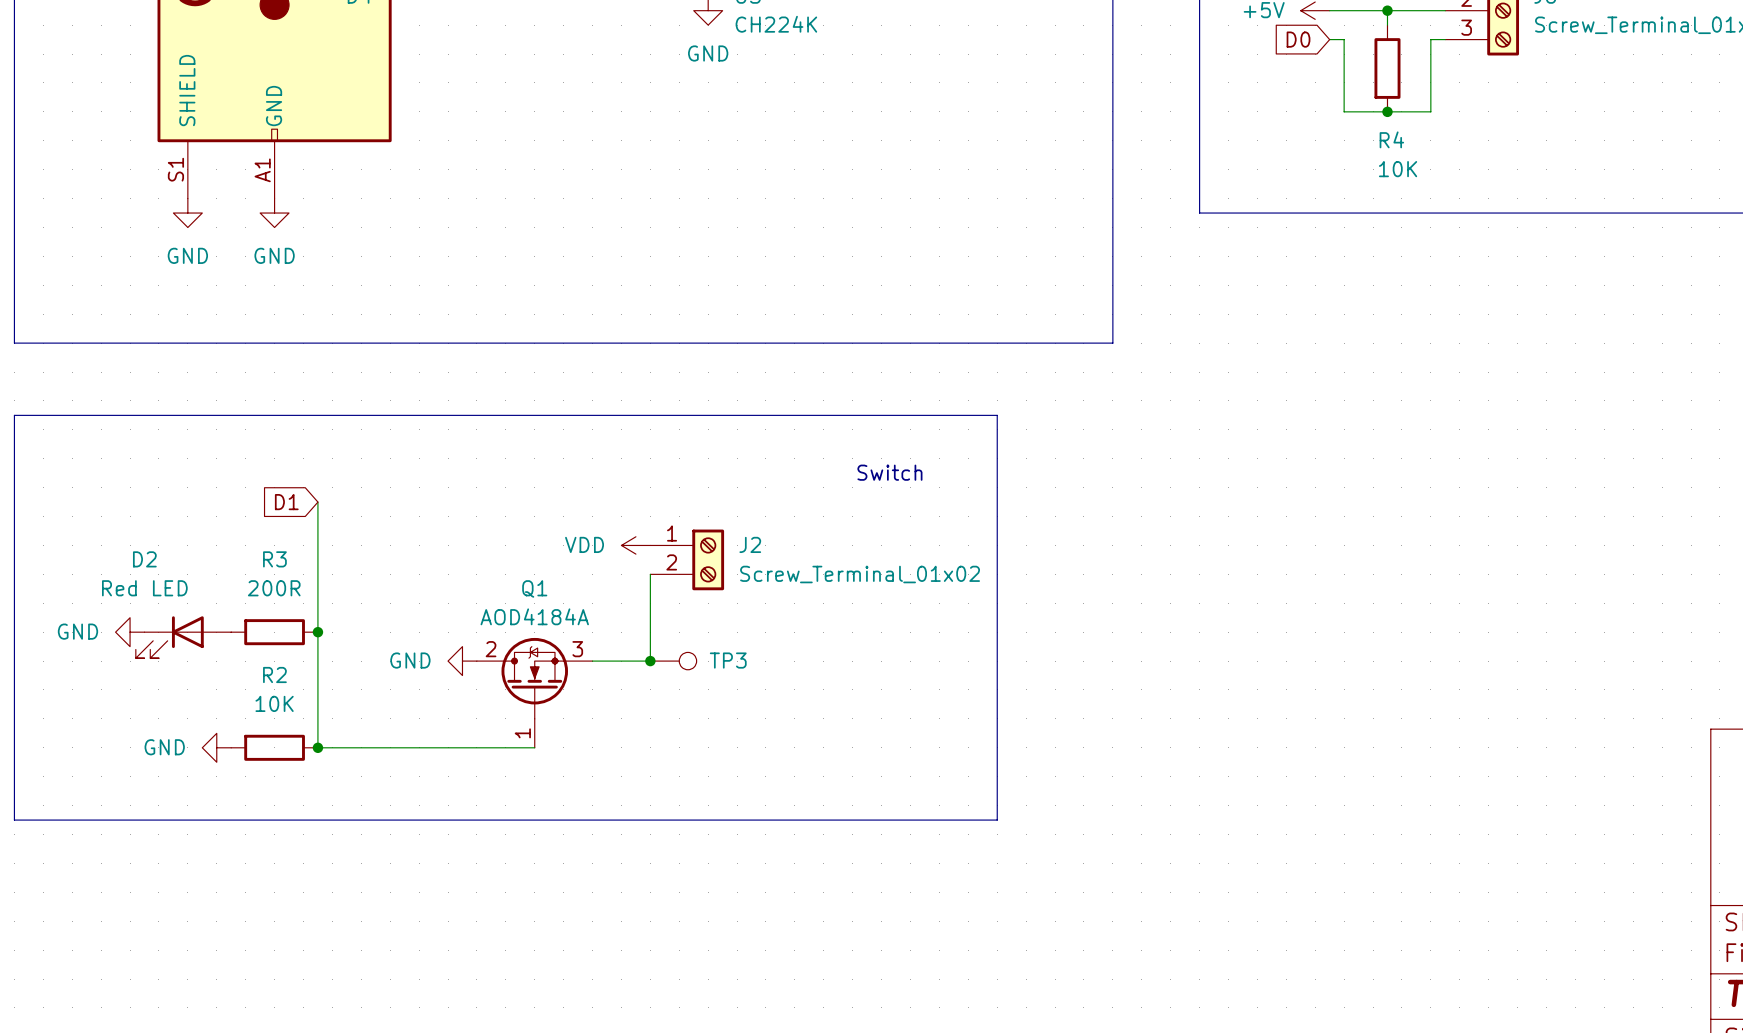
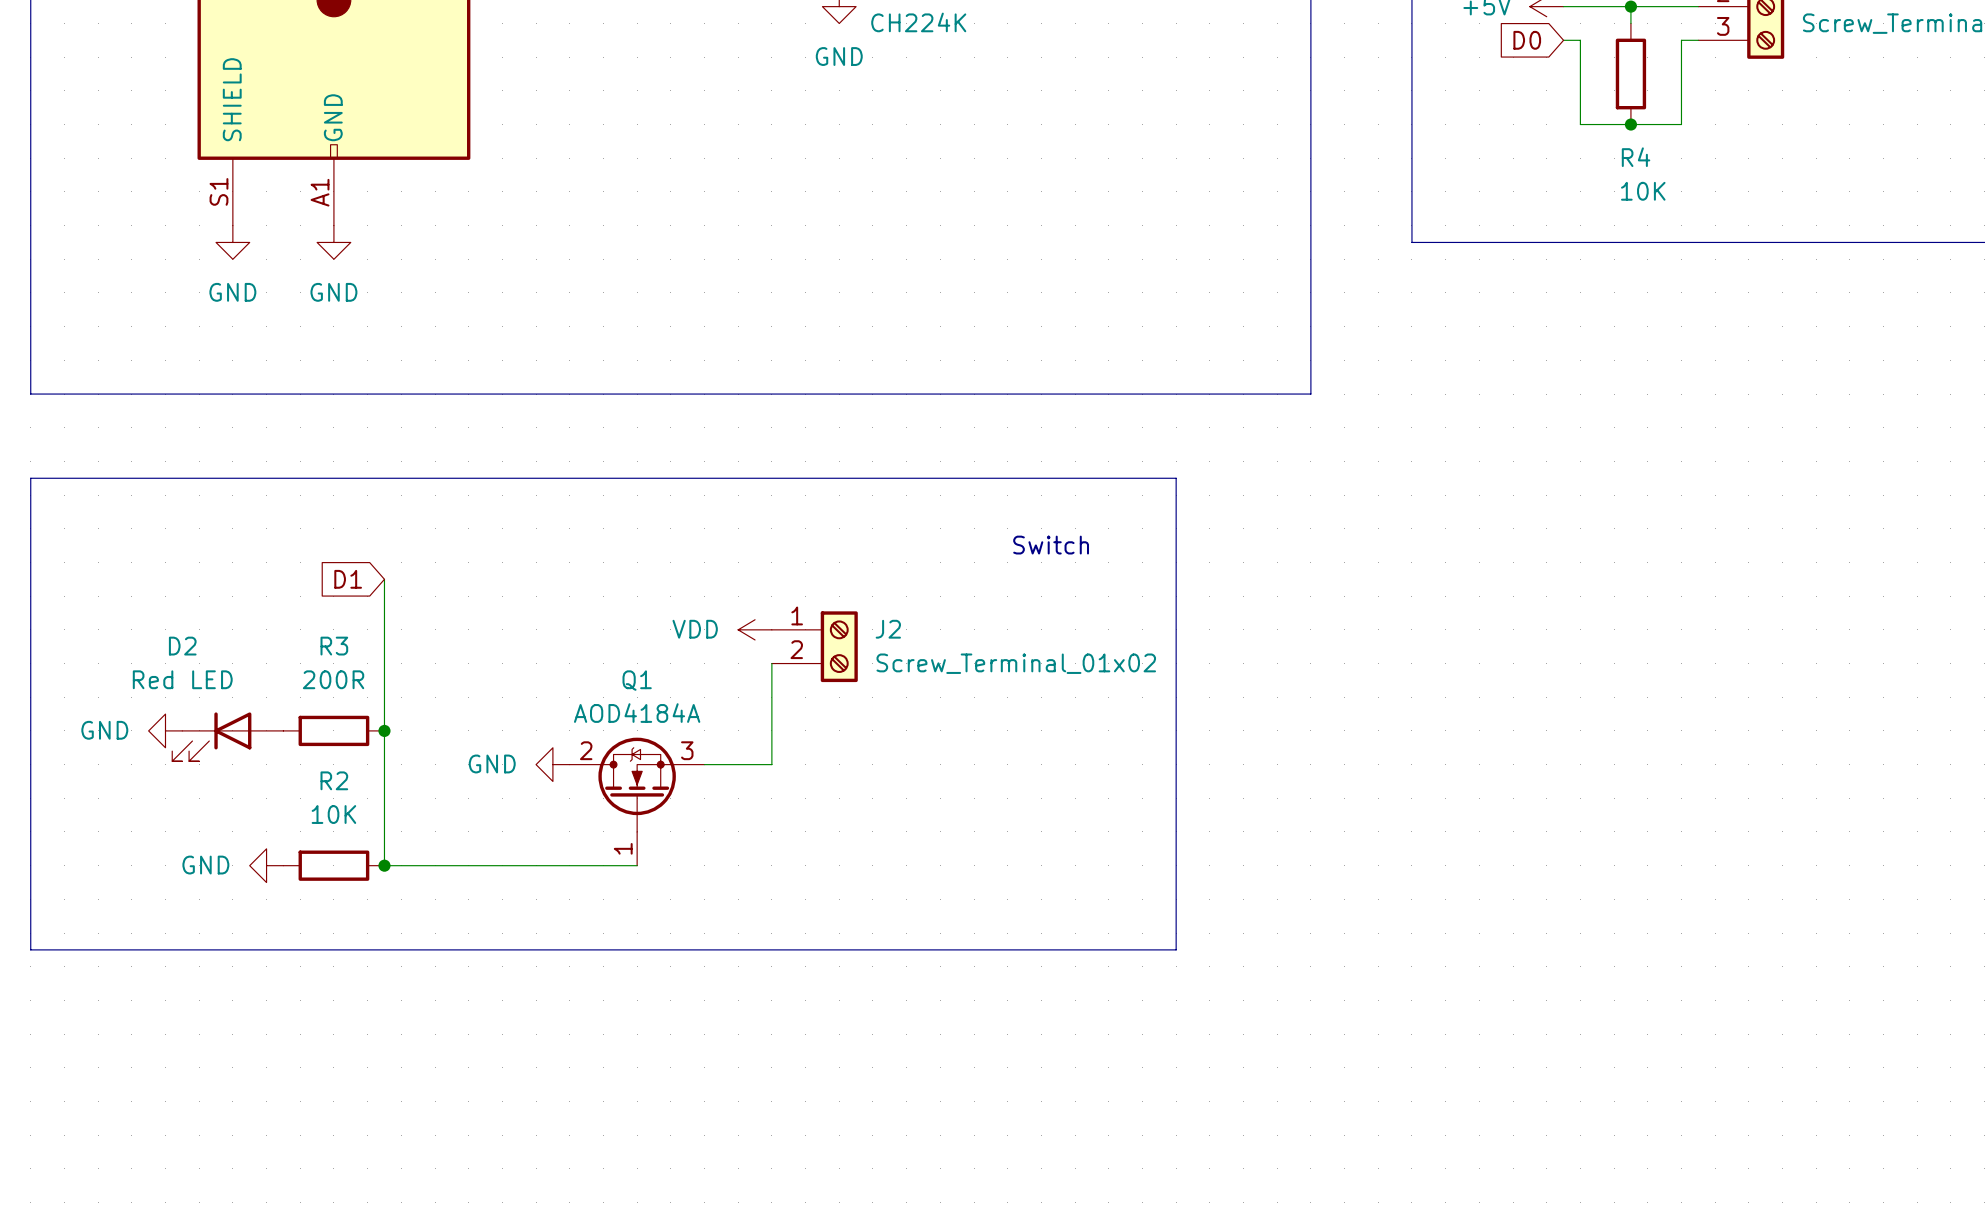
junction: (650, 661) -> none
TP3: (673, 661) -> none

